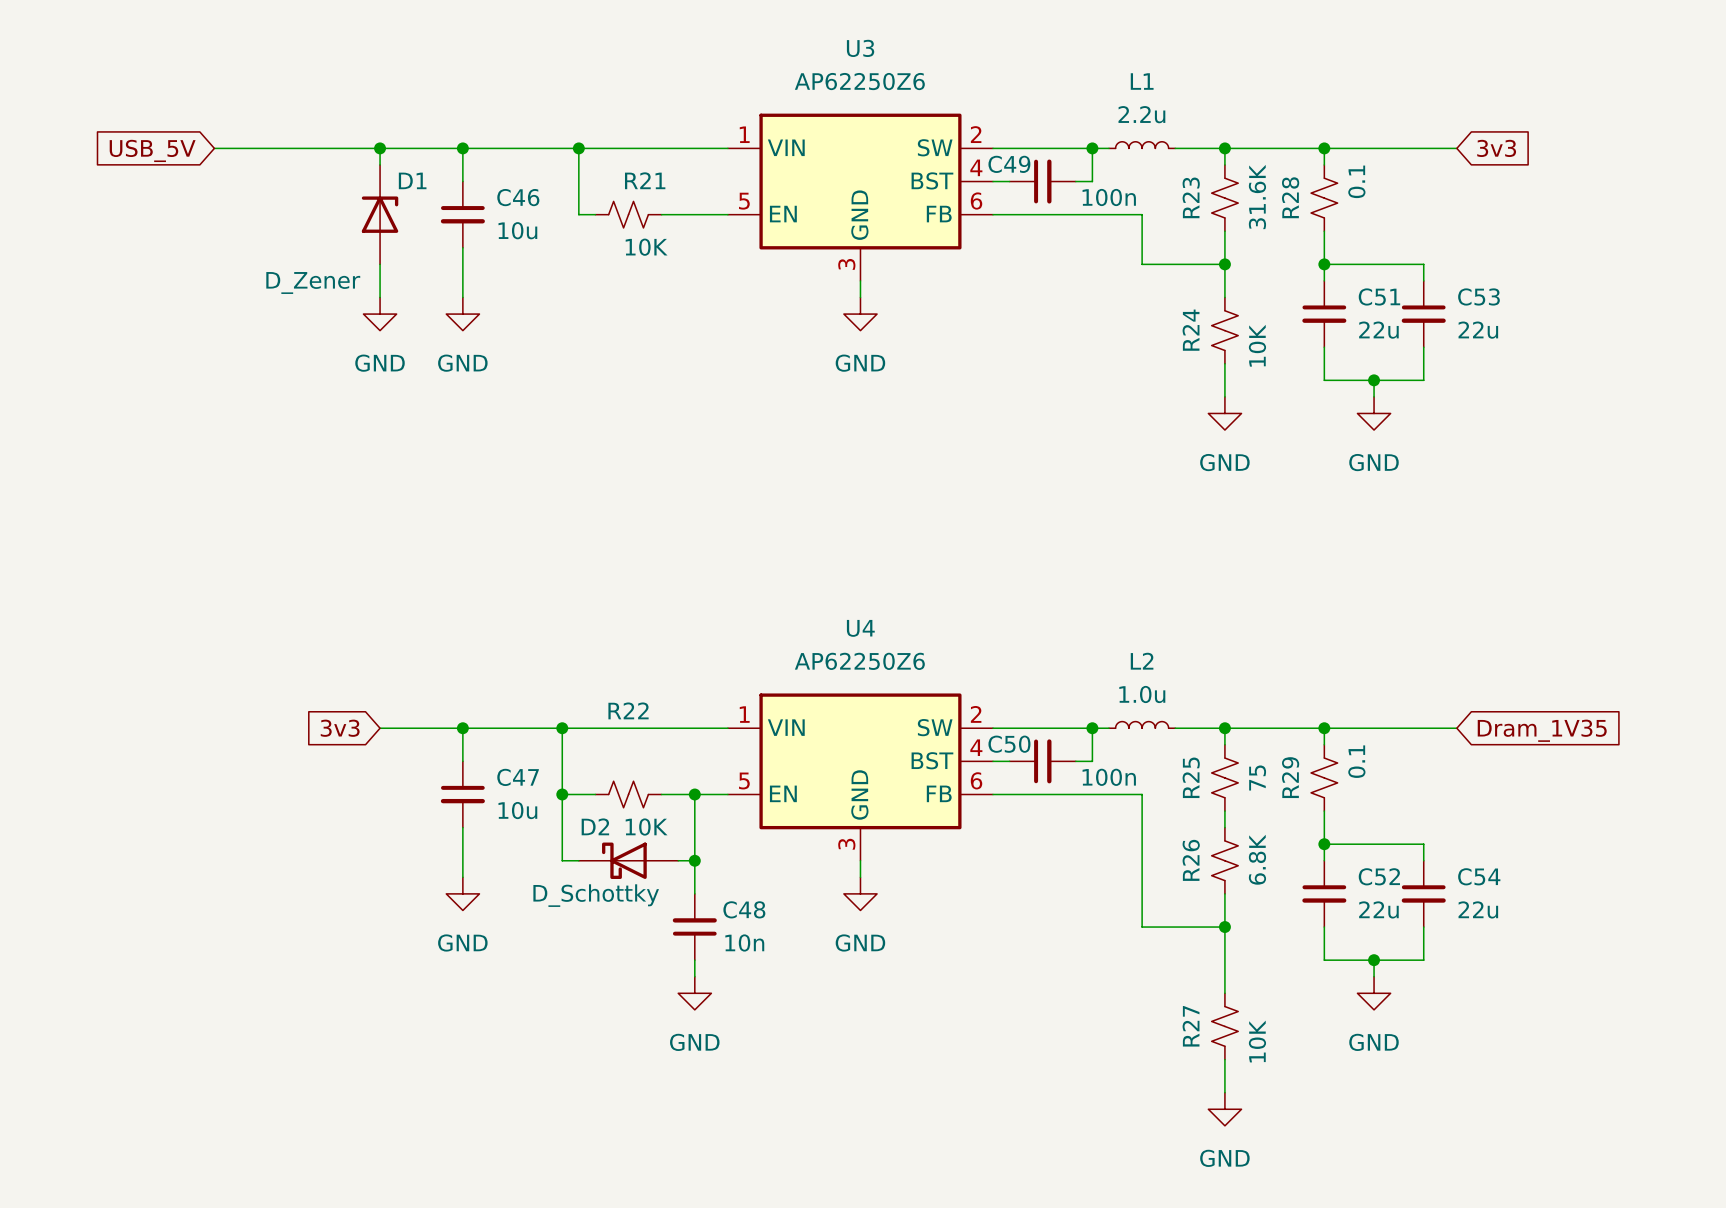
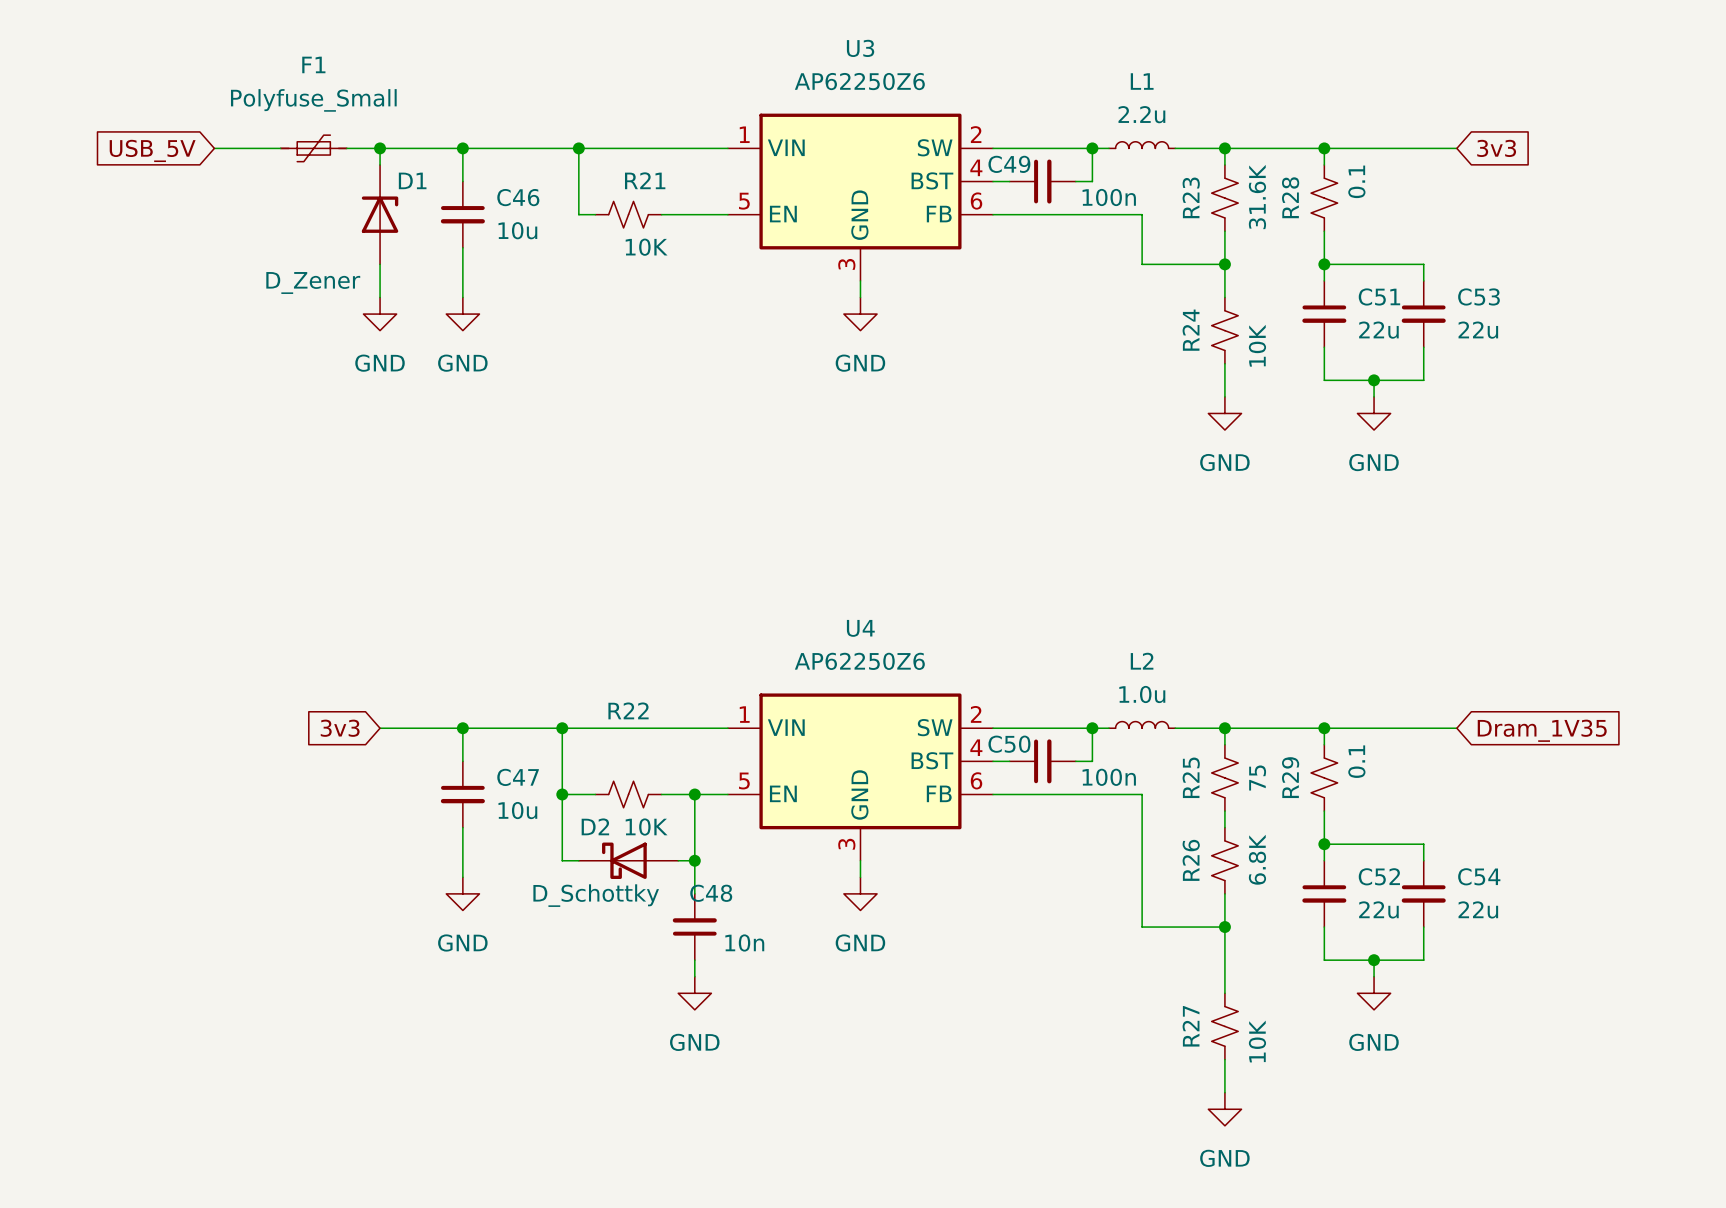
F1: none -> Polyfuse_Small (313, 148)
C48 name position: C48 (744, 909) -> C48 (711, 893)

